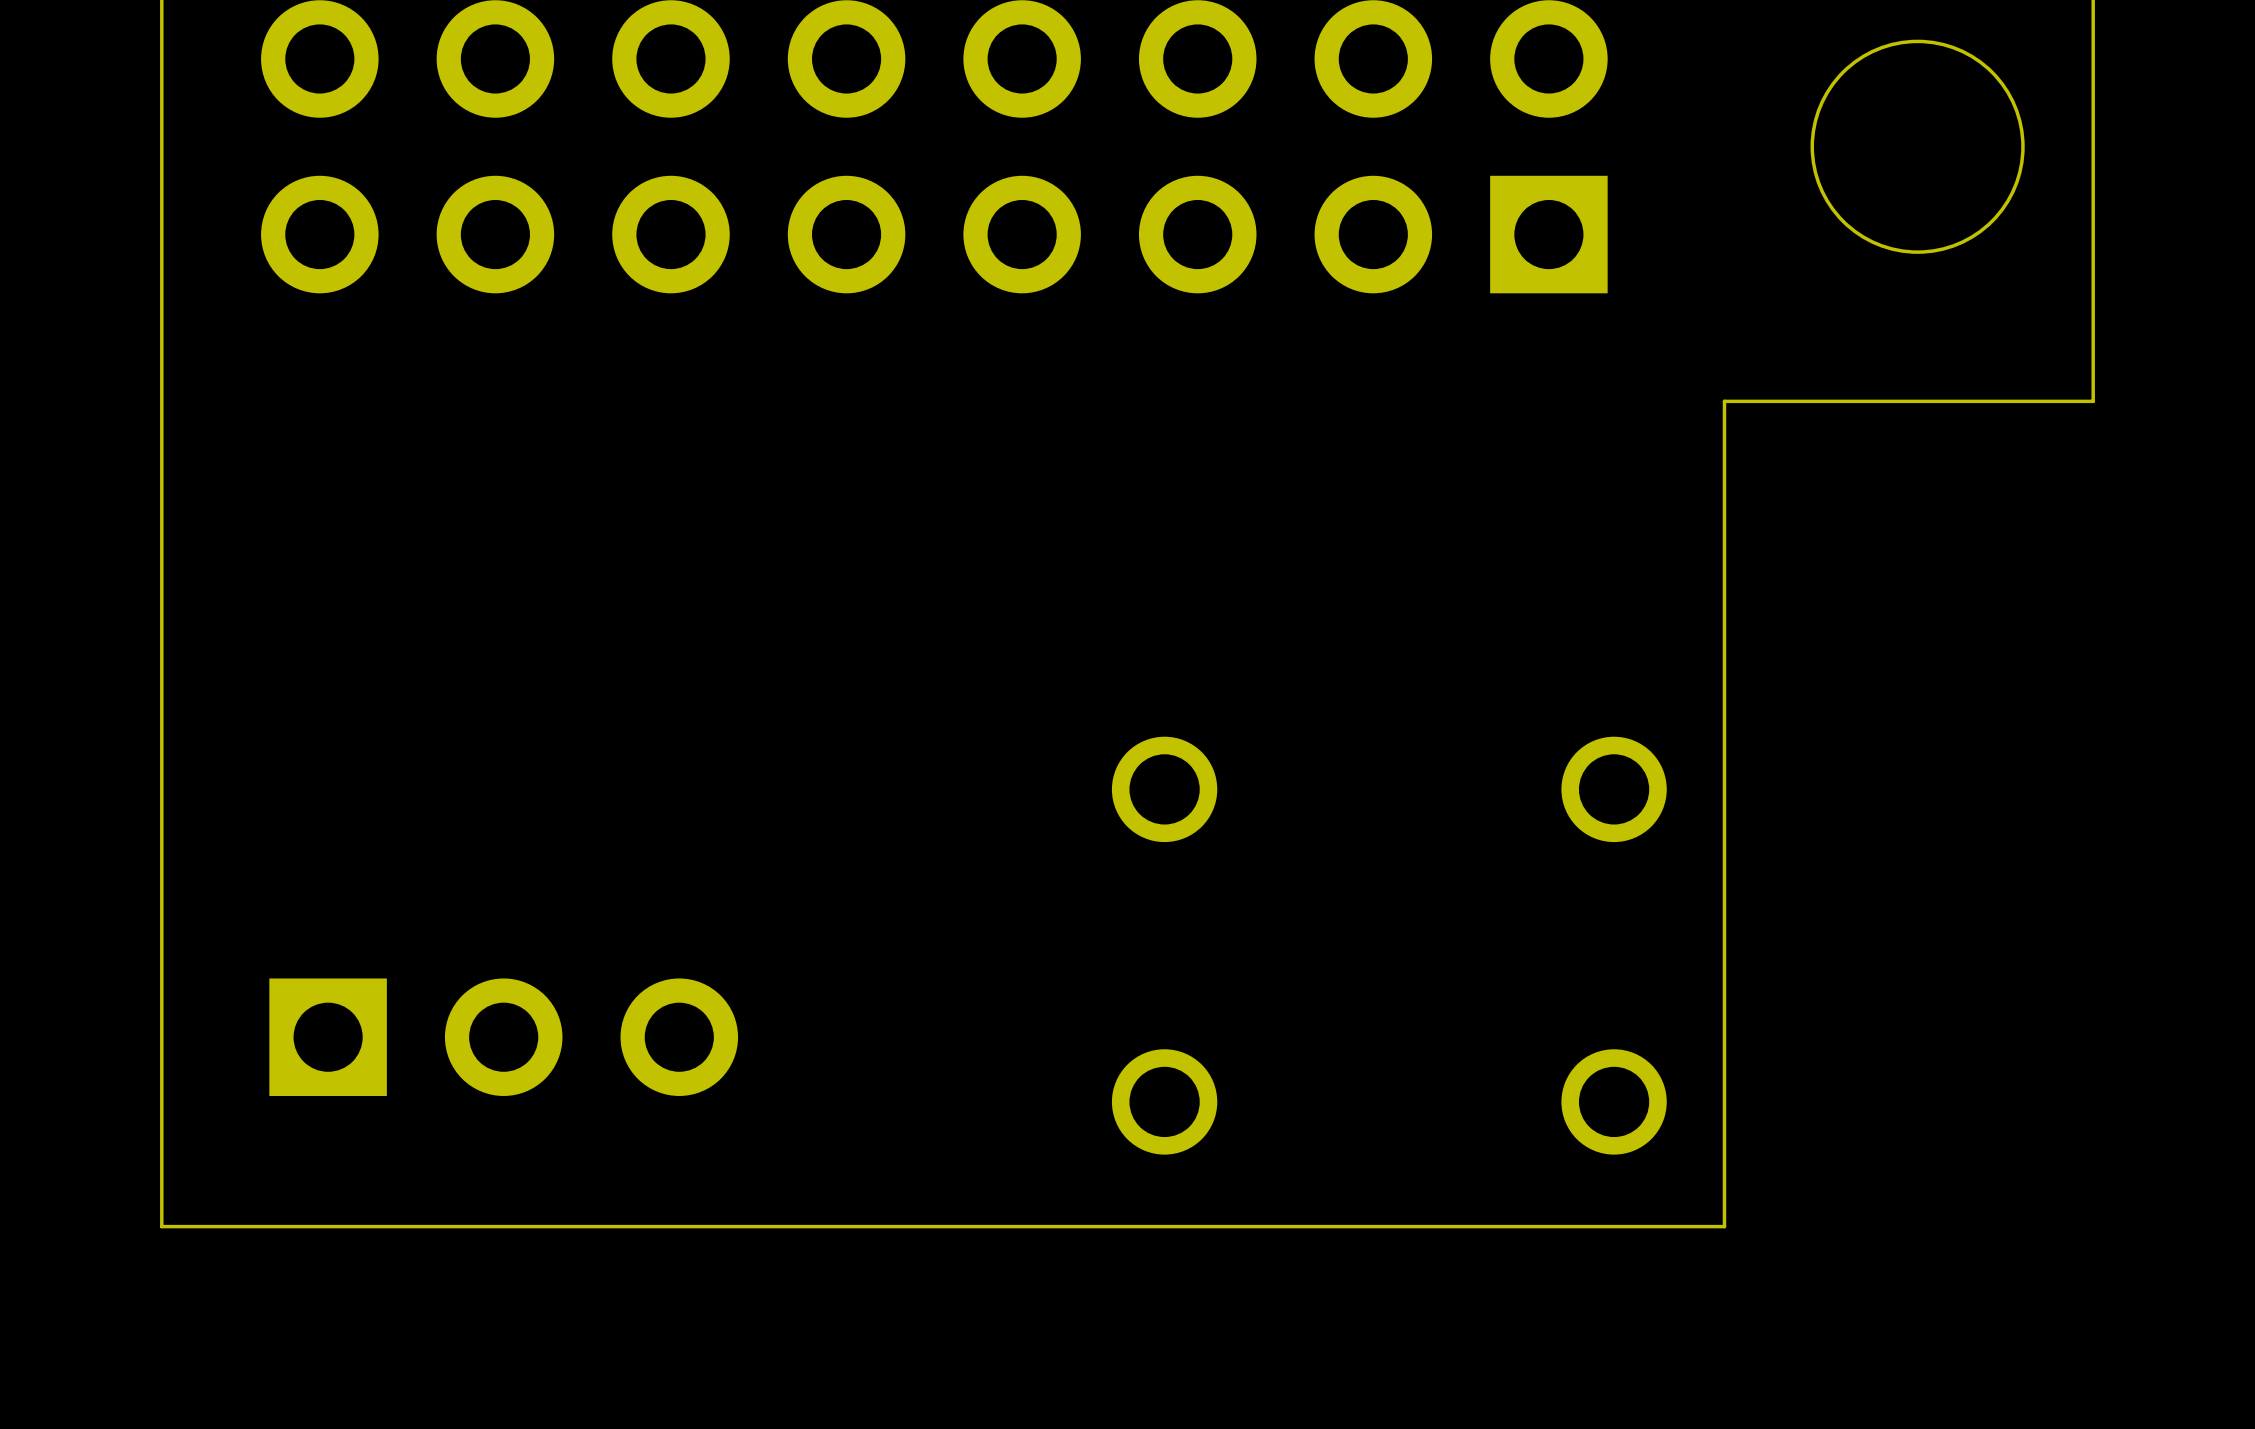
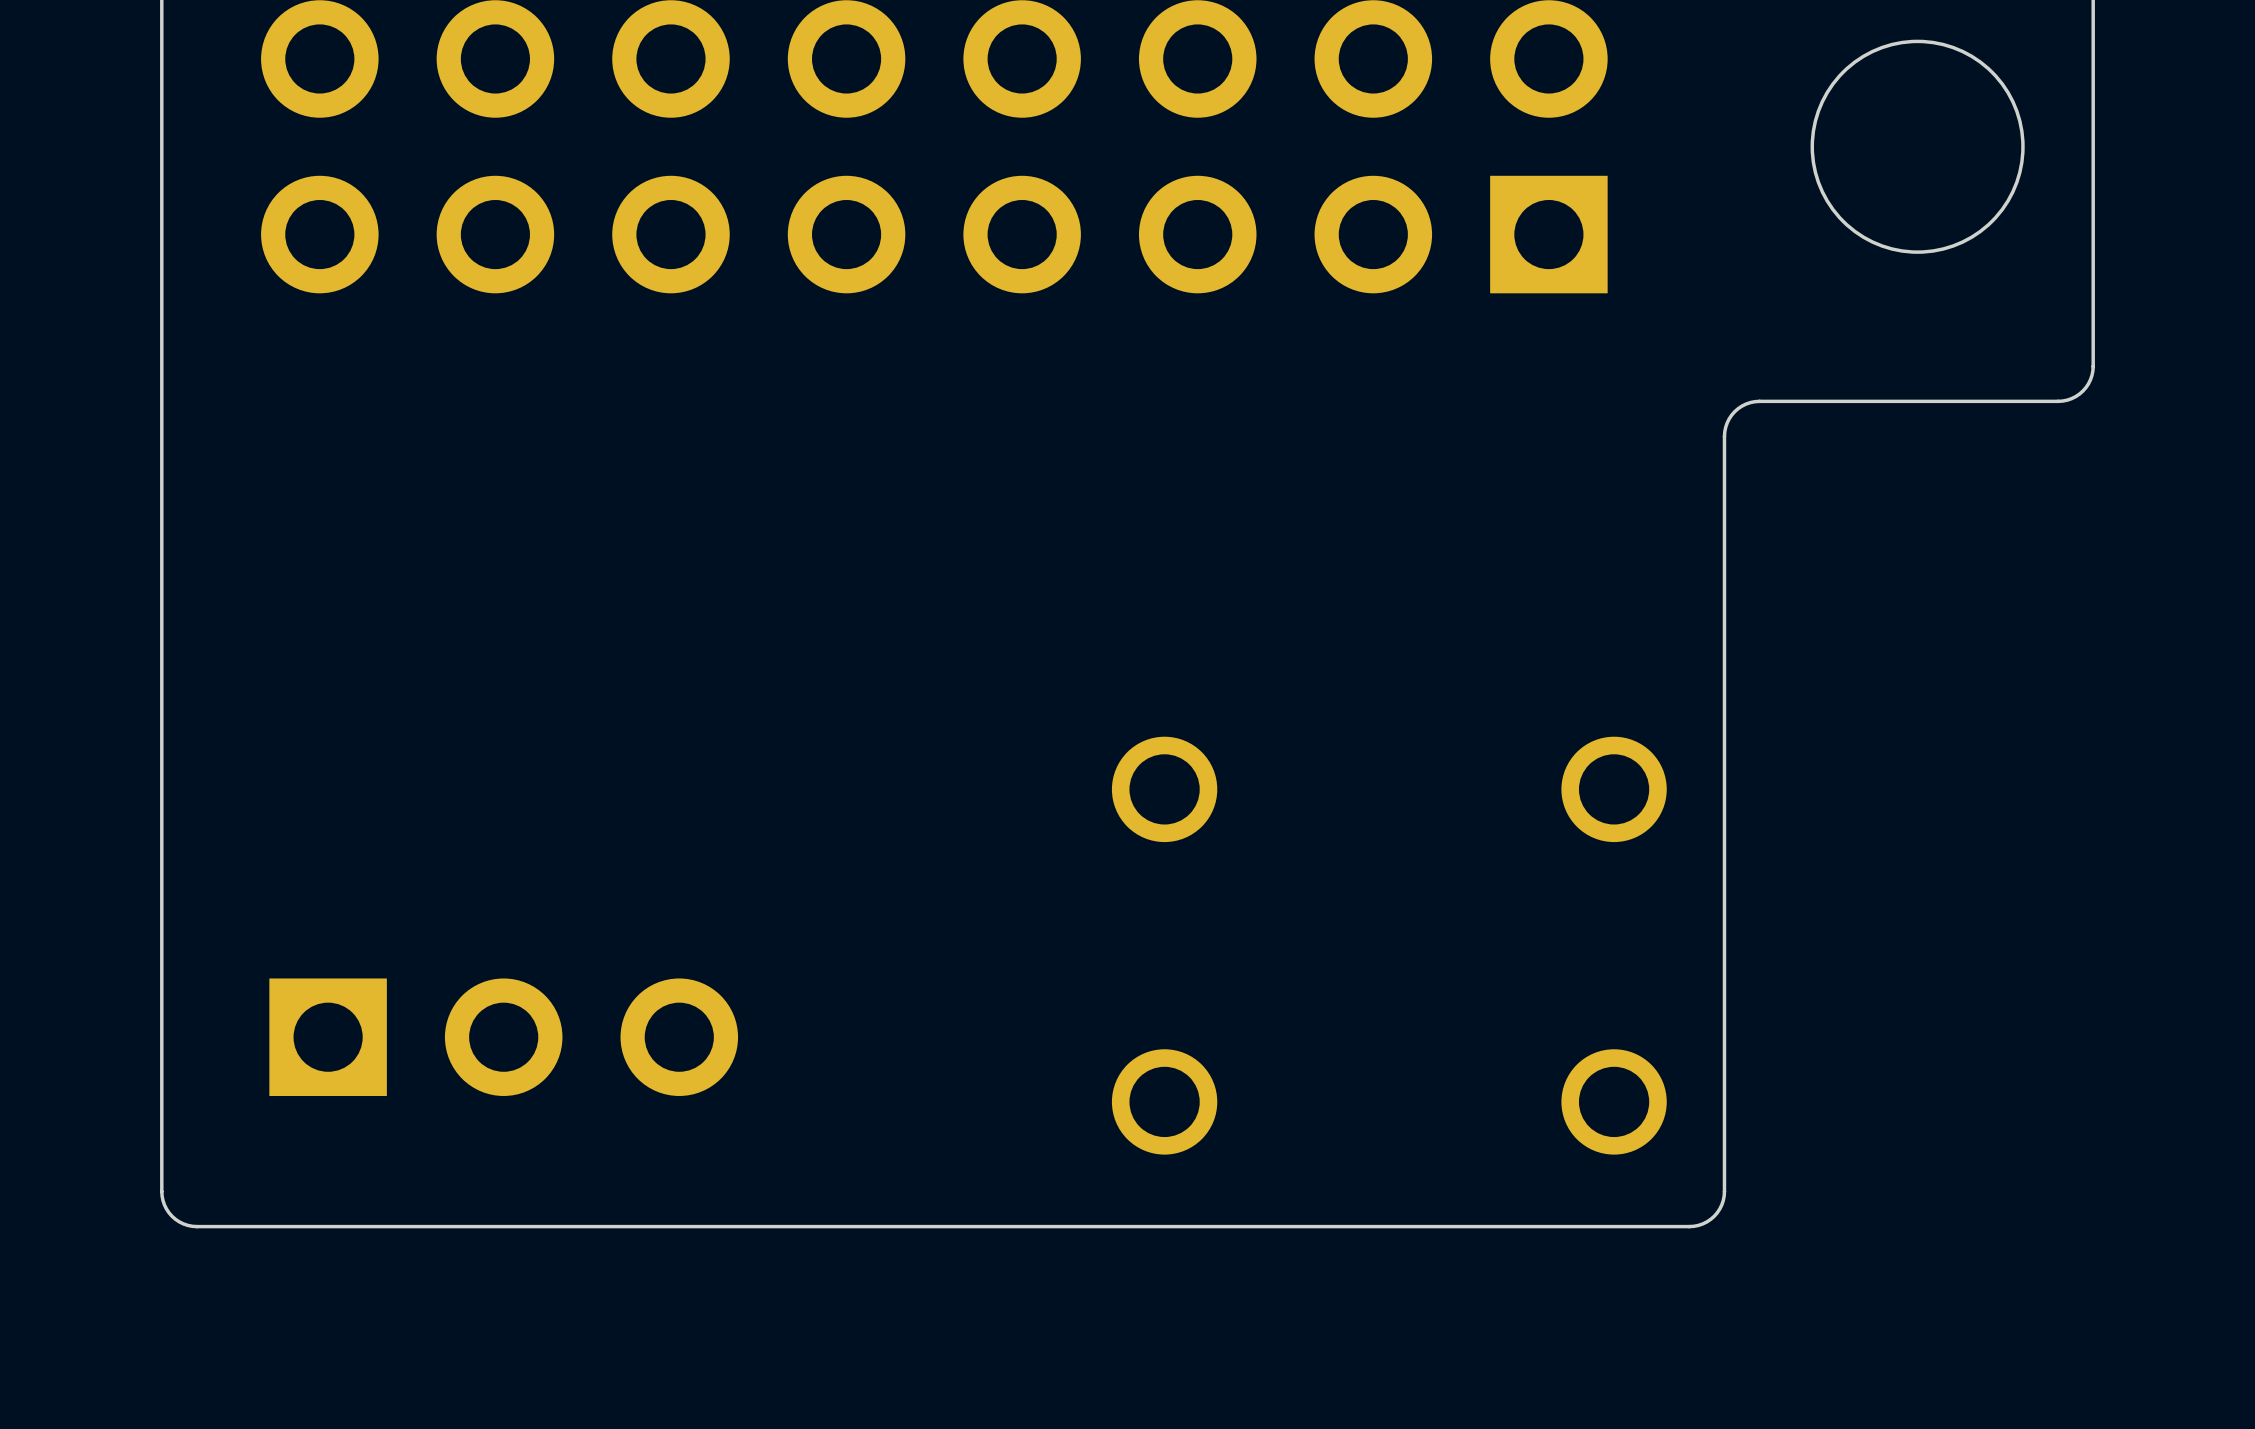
board edge: (2093, 366) (2093, 401) (2058, 401) -> (2093, 366) (2090, 379) (2082, 391) (2071, 398) (2058, 401)
board edge: (1759, 401) (1724, 401) (1724, 436) -> (1759, 401) (1746, 404) (1734, 411) (1727, 423) (1724, 436)
board edge: (161, 1191) (161, 1226) (196, 1226) -> (161, 1191) (164, 1204) (172, 1216) (183, 1223) (196, 1226)
board edge: (1724, 1191) (1724, 1226) (1689, 1226) -> (1724, 1191) (1721, 1204) (1714, 1216) (1702, 1223) (1689, 1226)

